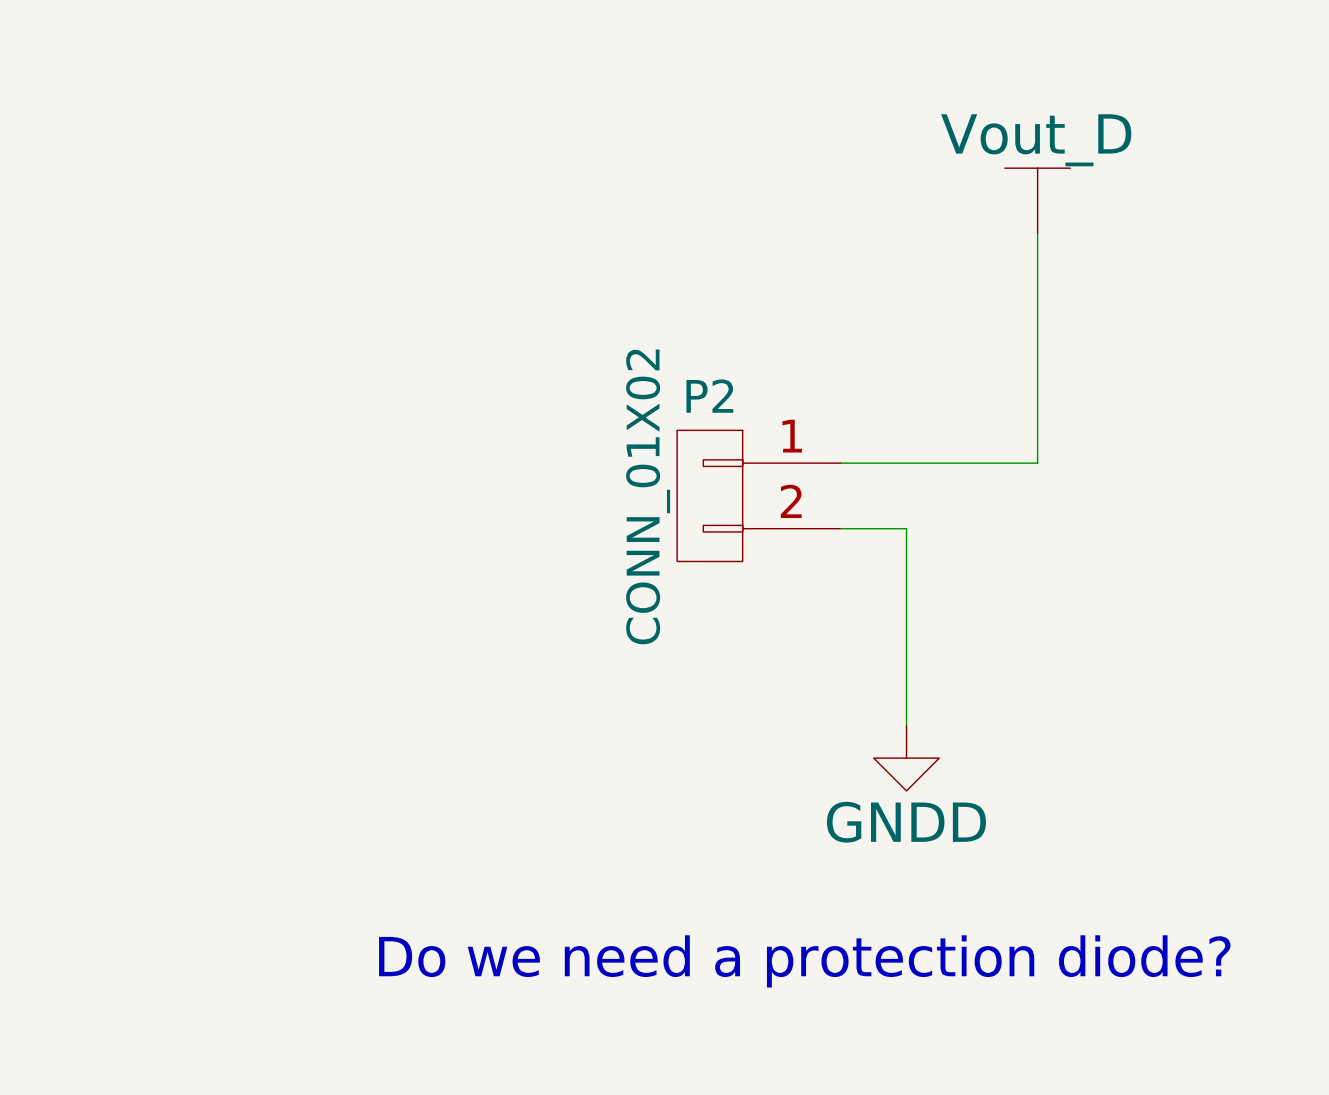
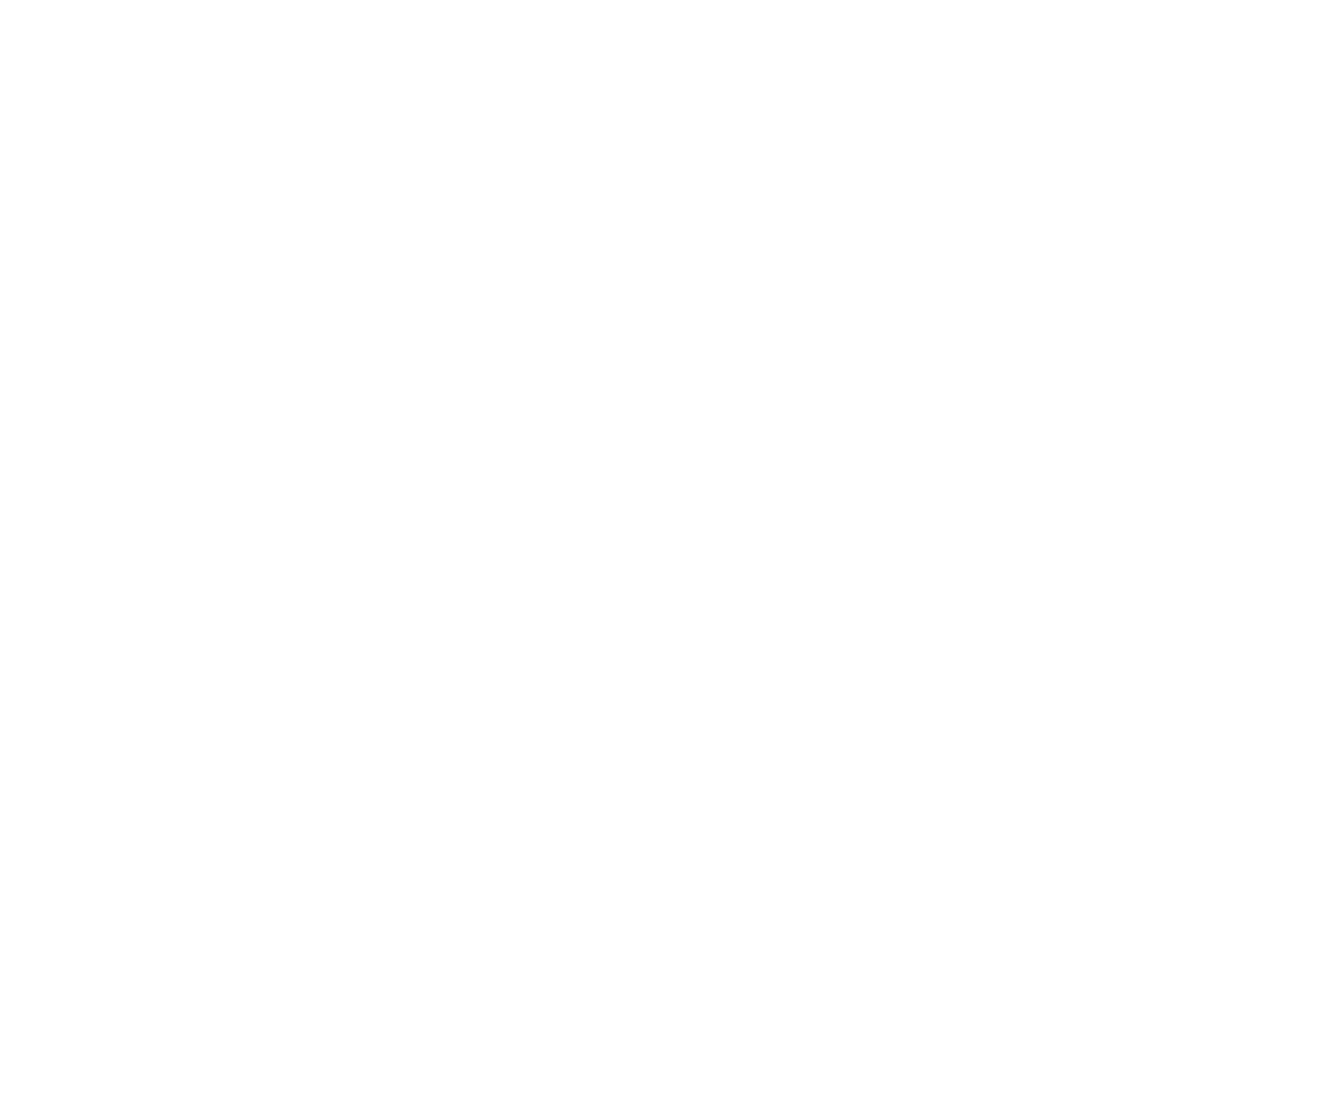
power symbol: Vout_D (1037, 200) -> none
wire: (1037, 233) (1037, 463) (840, 463) -> none
P2: CONN_01X02 (759, 495) -> none
wire: (840, 528) (906, 528) (906, 725) -> none
power symbol: GNDD (906, 758) -> none
text: Do we need a protection diode? (804, 961) -> none

